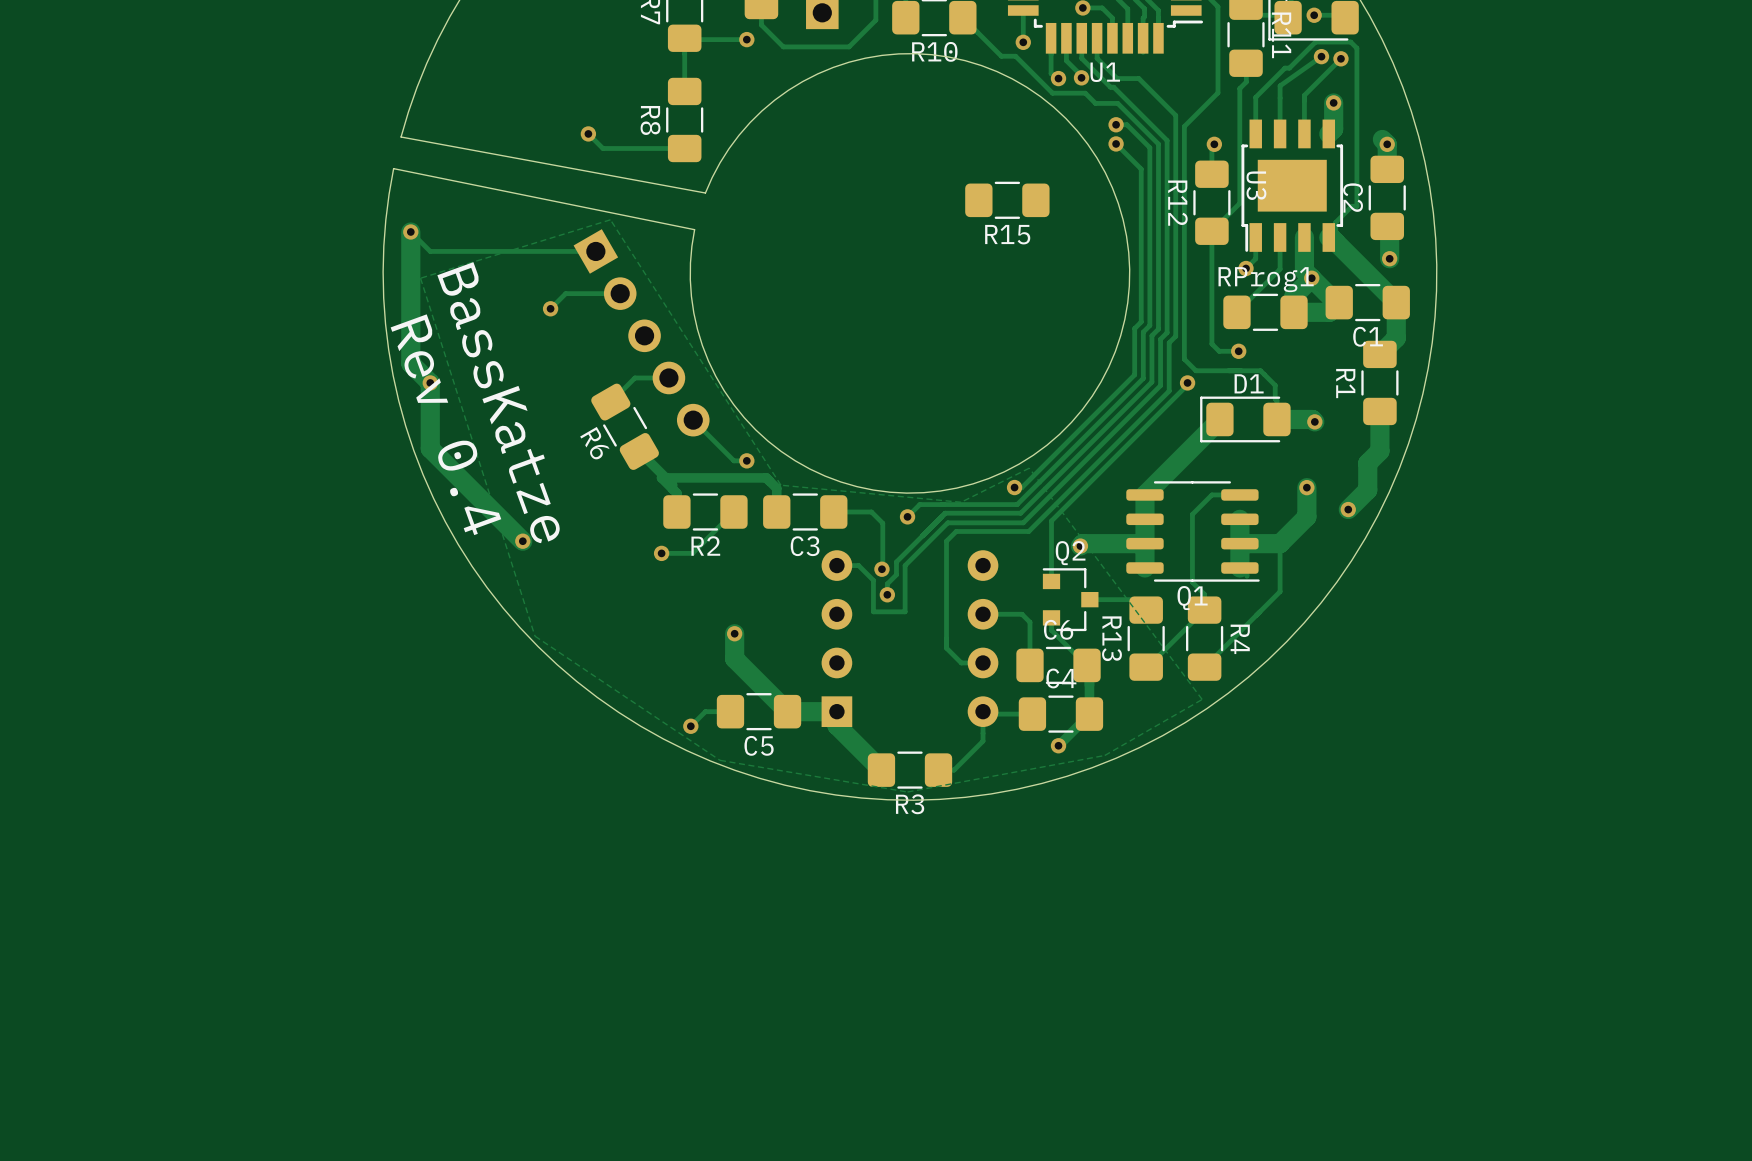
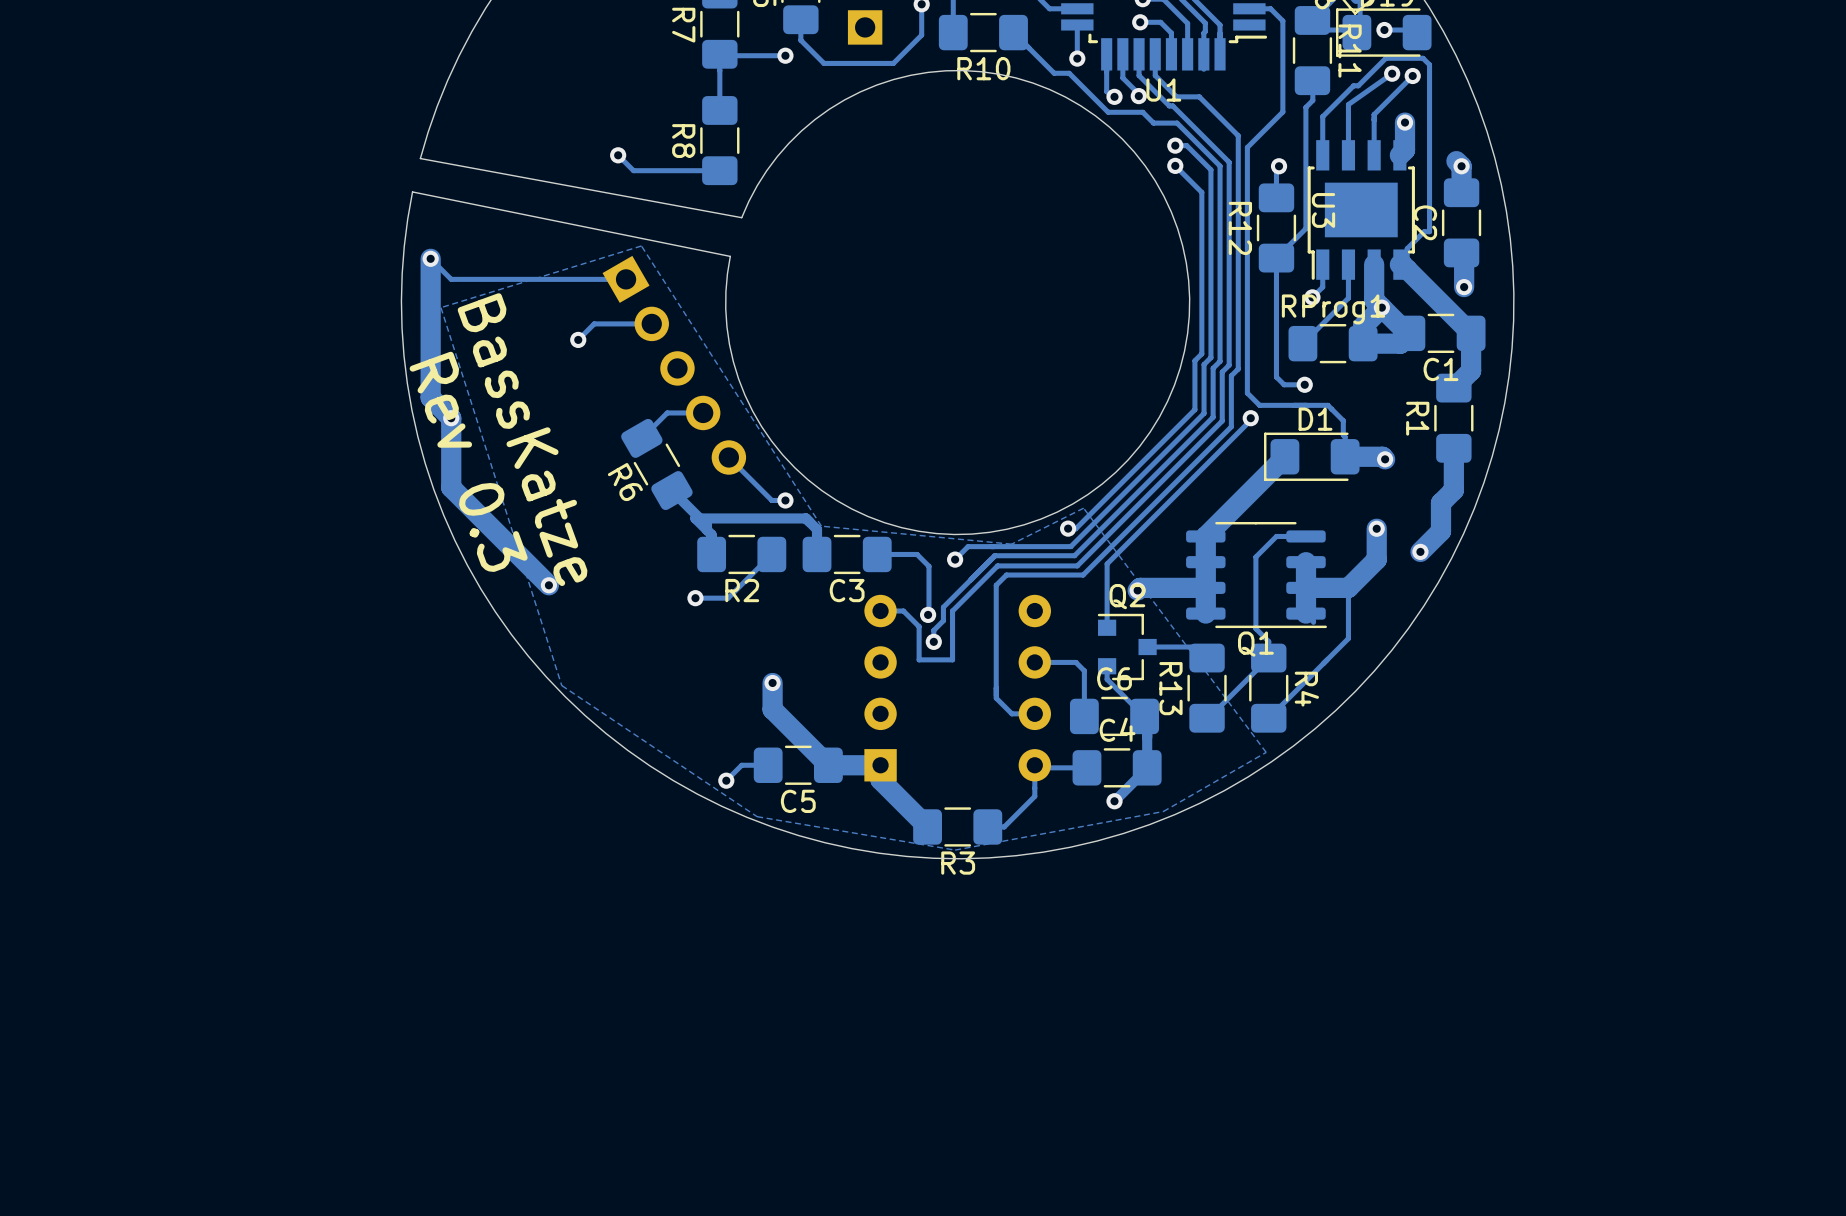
R15: (1007, 200) -> none
text: Rev 0.4 (445, 424) -> Rev 0.3 (468, 461)

